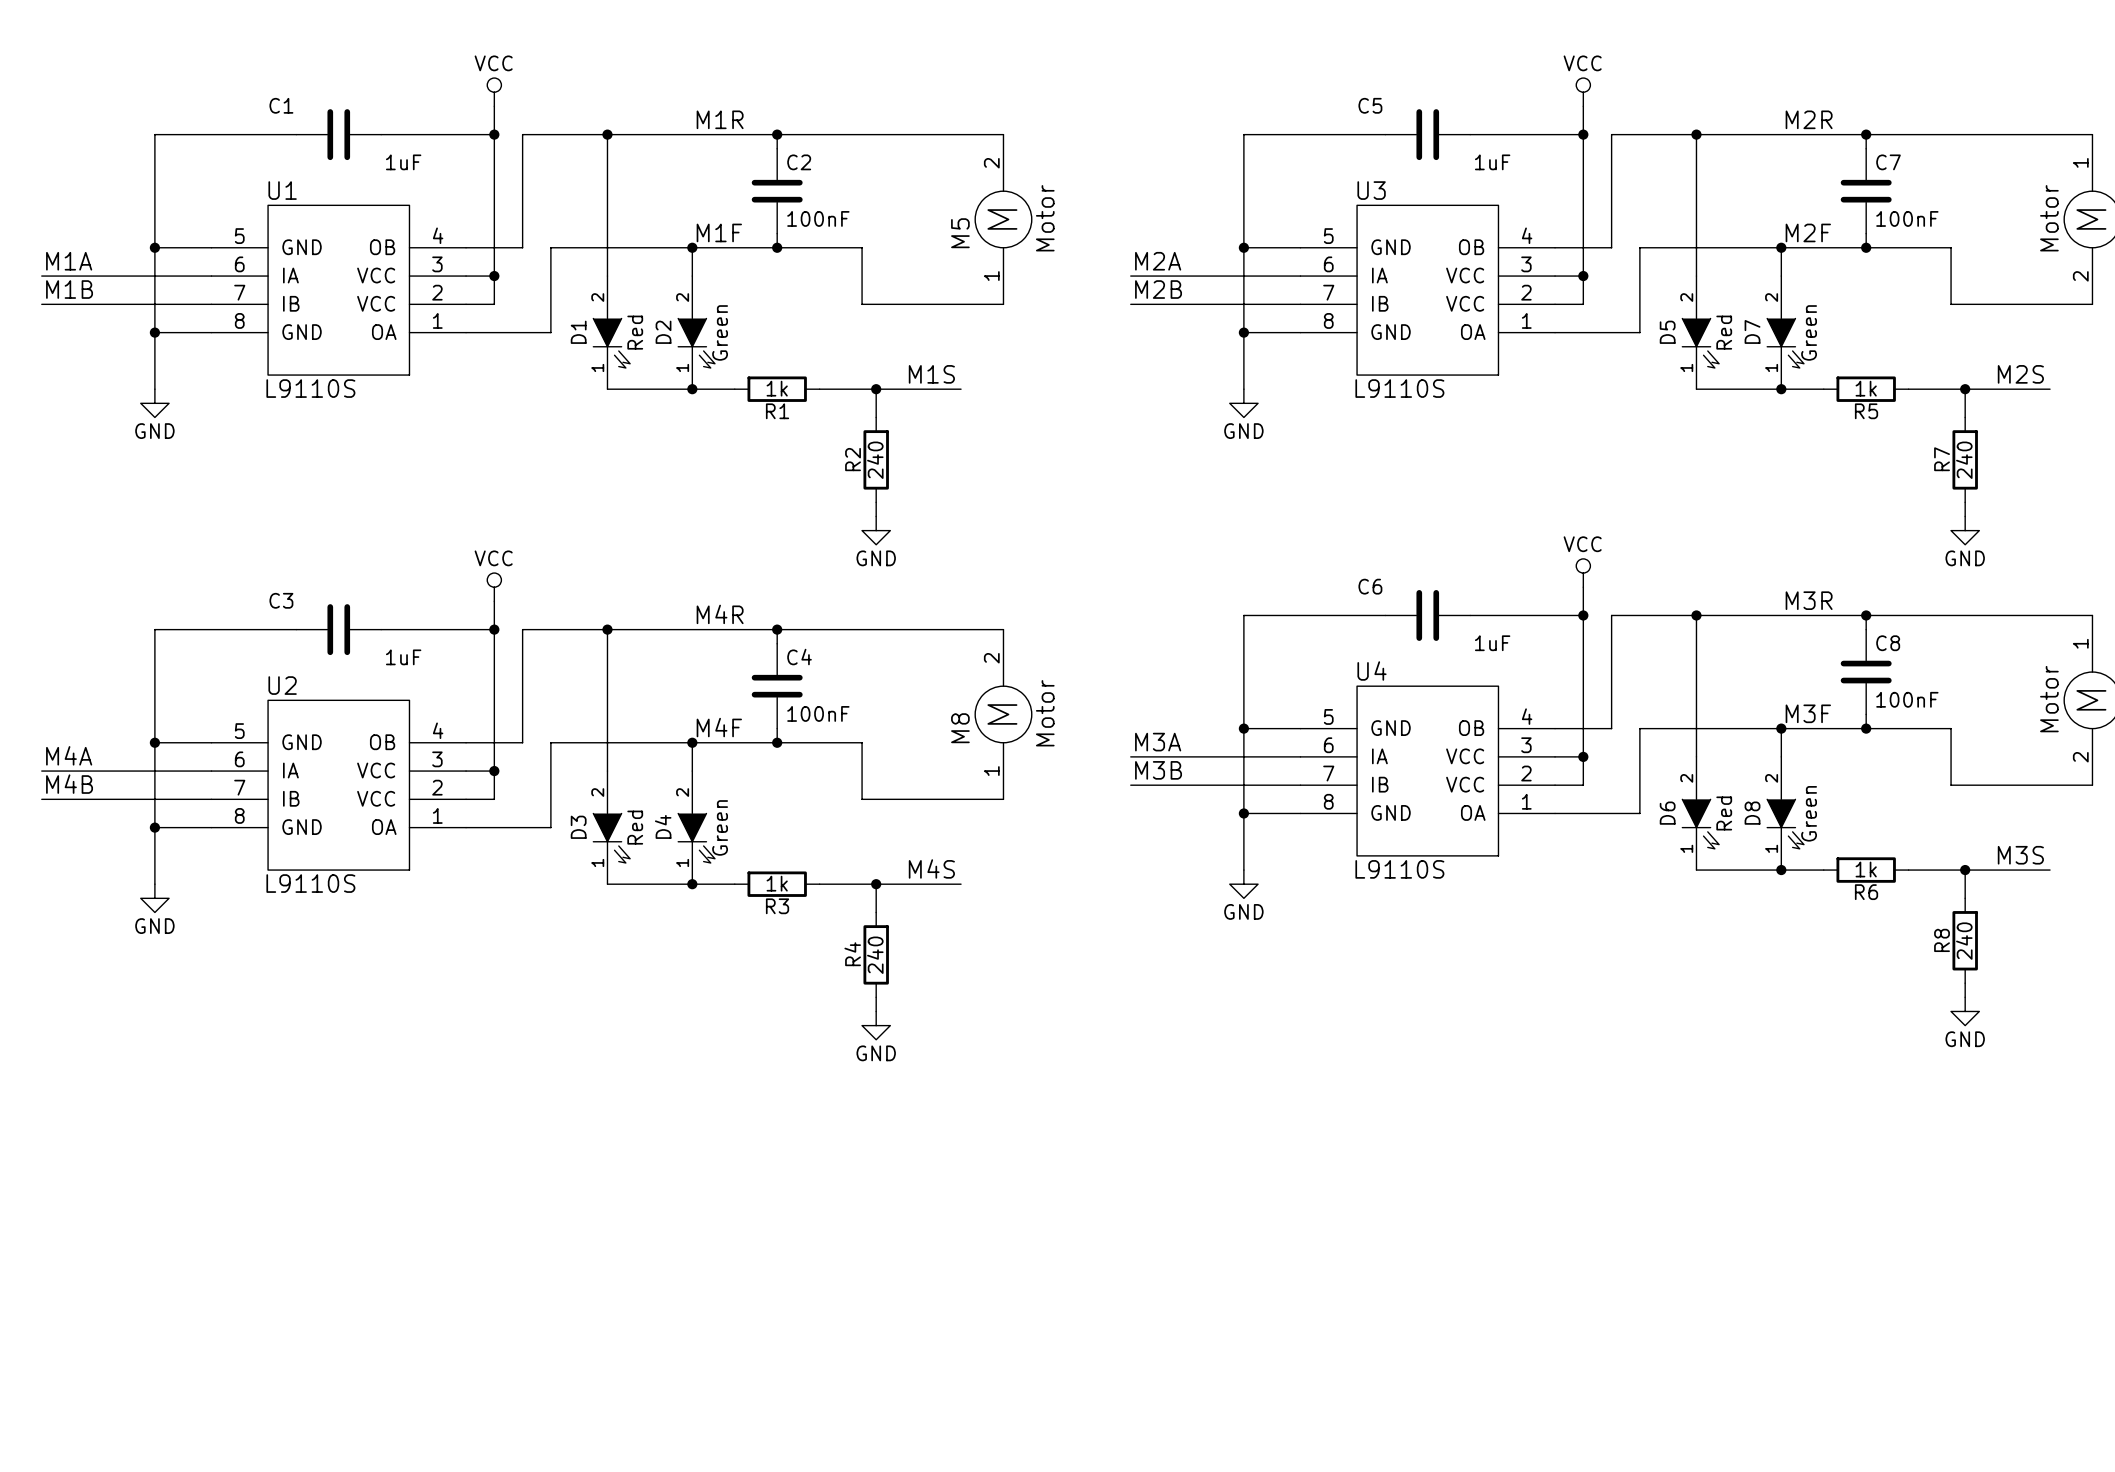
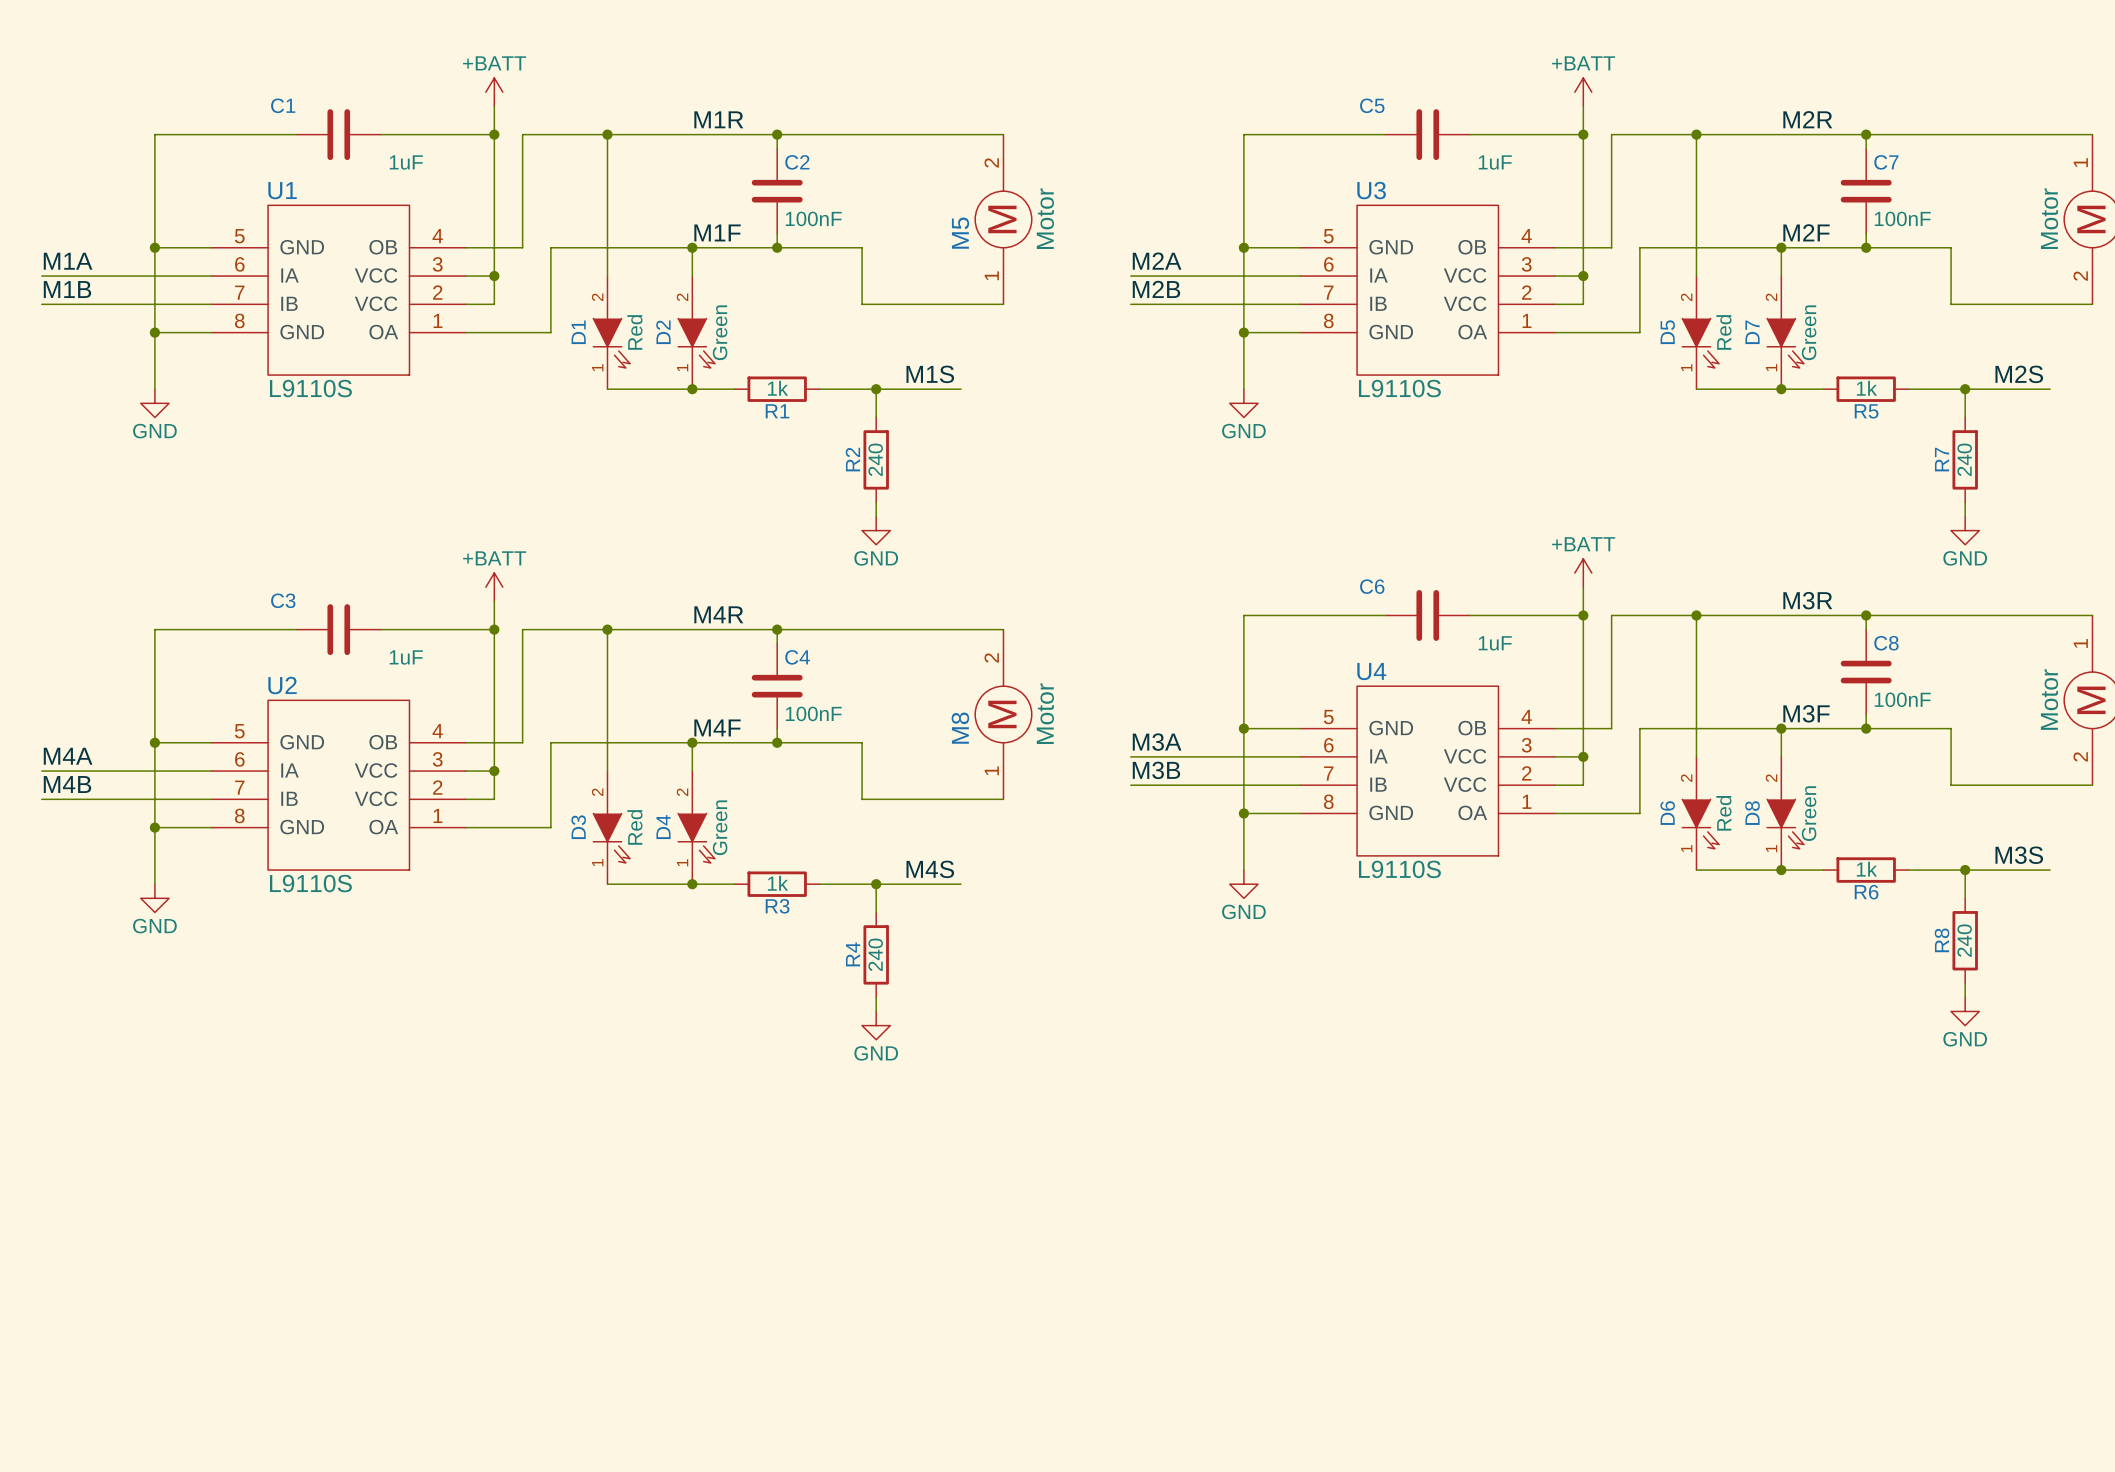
power symbol: VCC (494, 92) -> +BATT (494, 92)
power symbol: VCC (1583, 92) -> +BATT (1583, 92)
power symbol: VCC (1583, 573) -> +BATT (1583, 573)
power symbol: VCC (494, 587) -> +BATT (494, 587)

